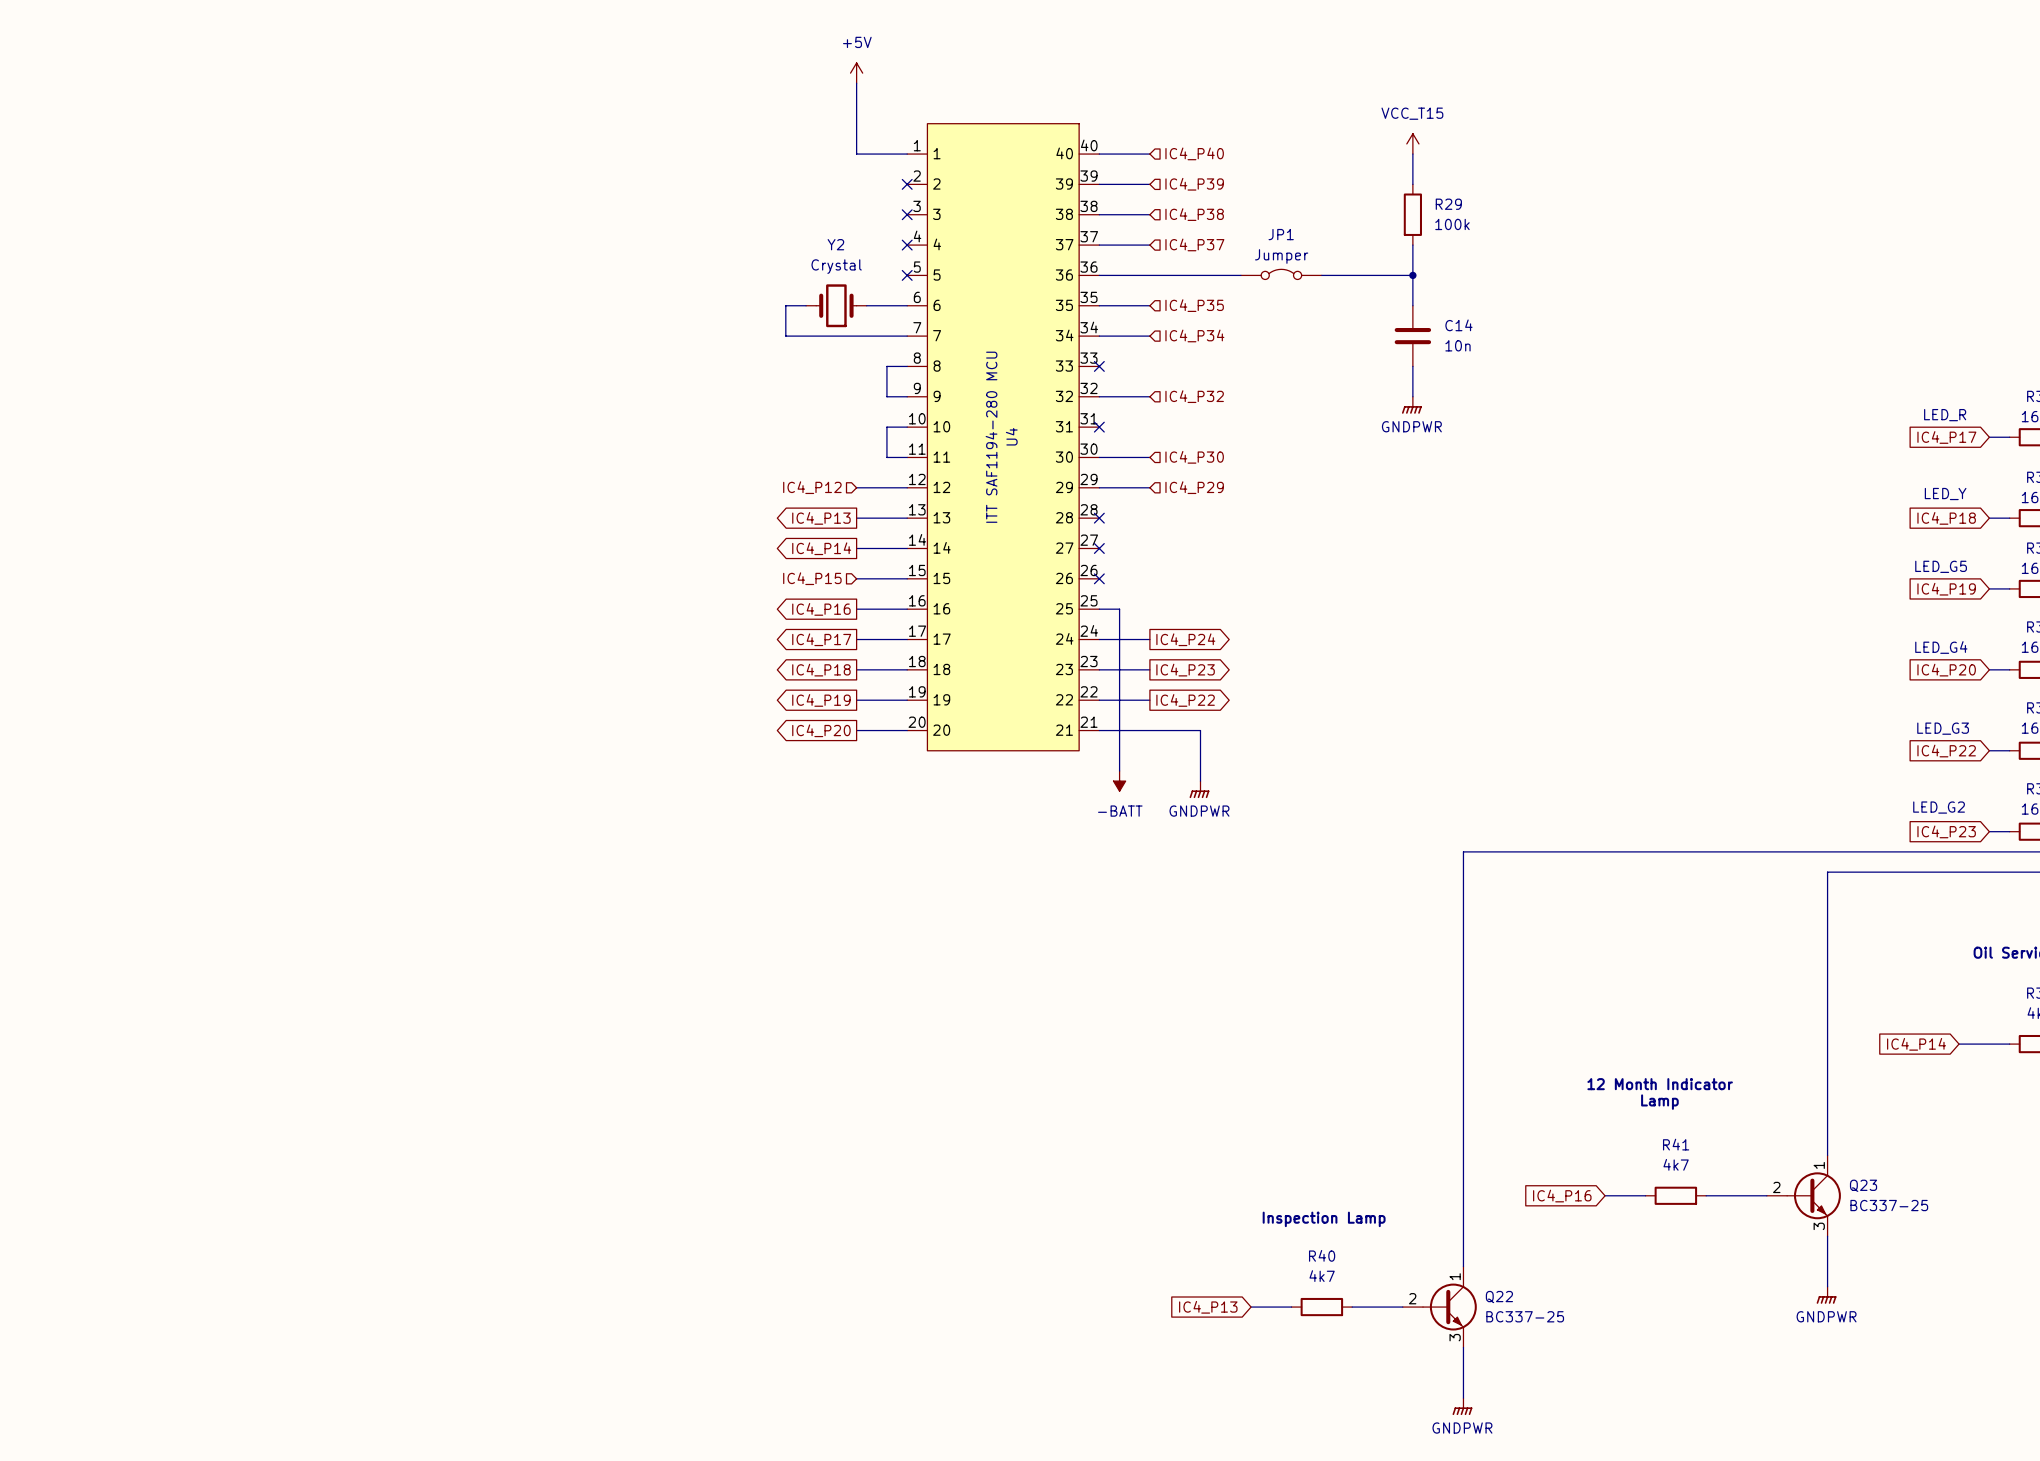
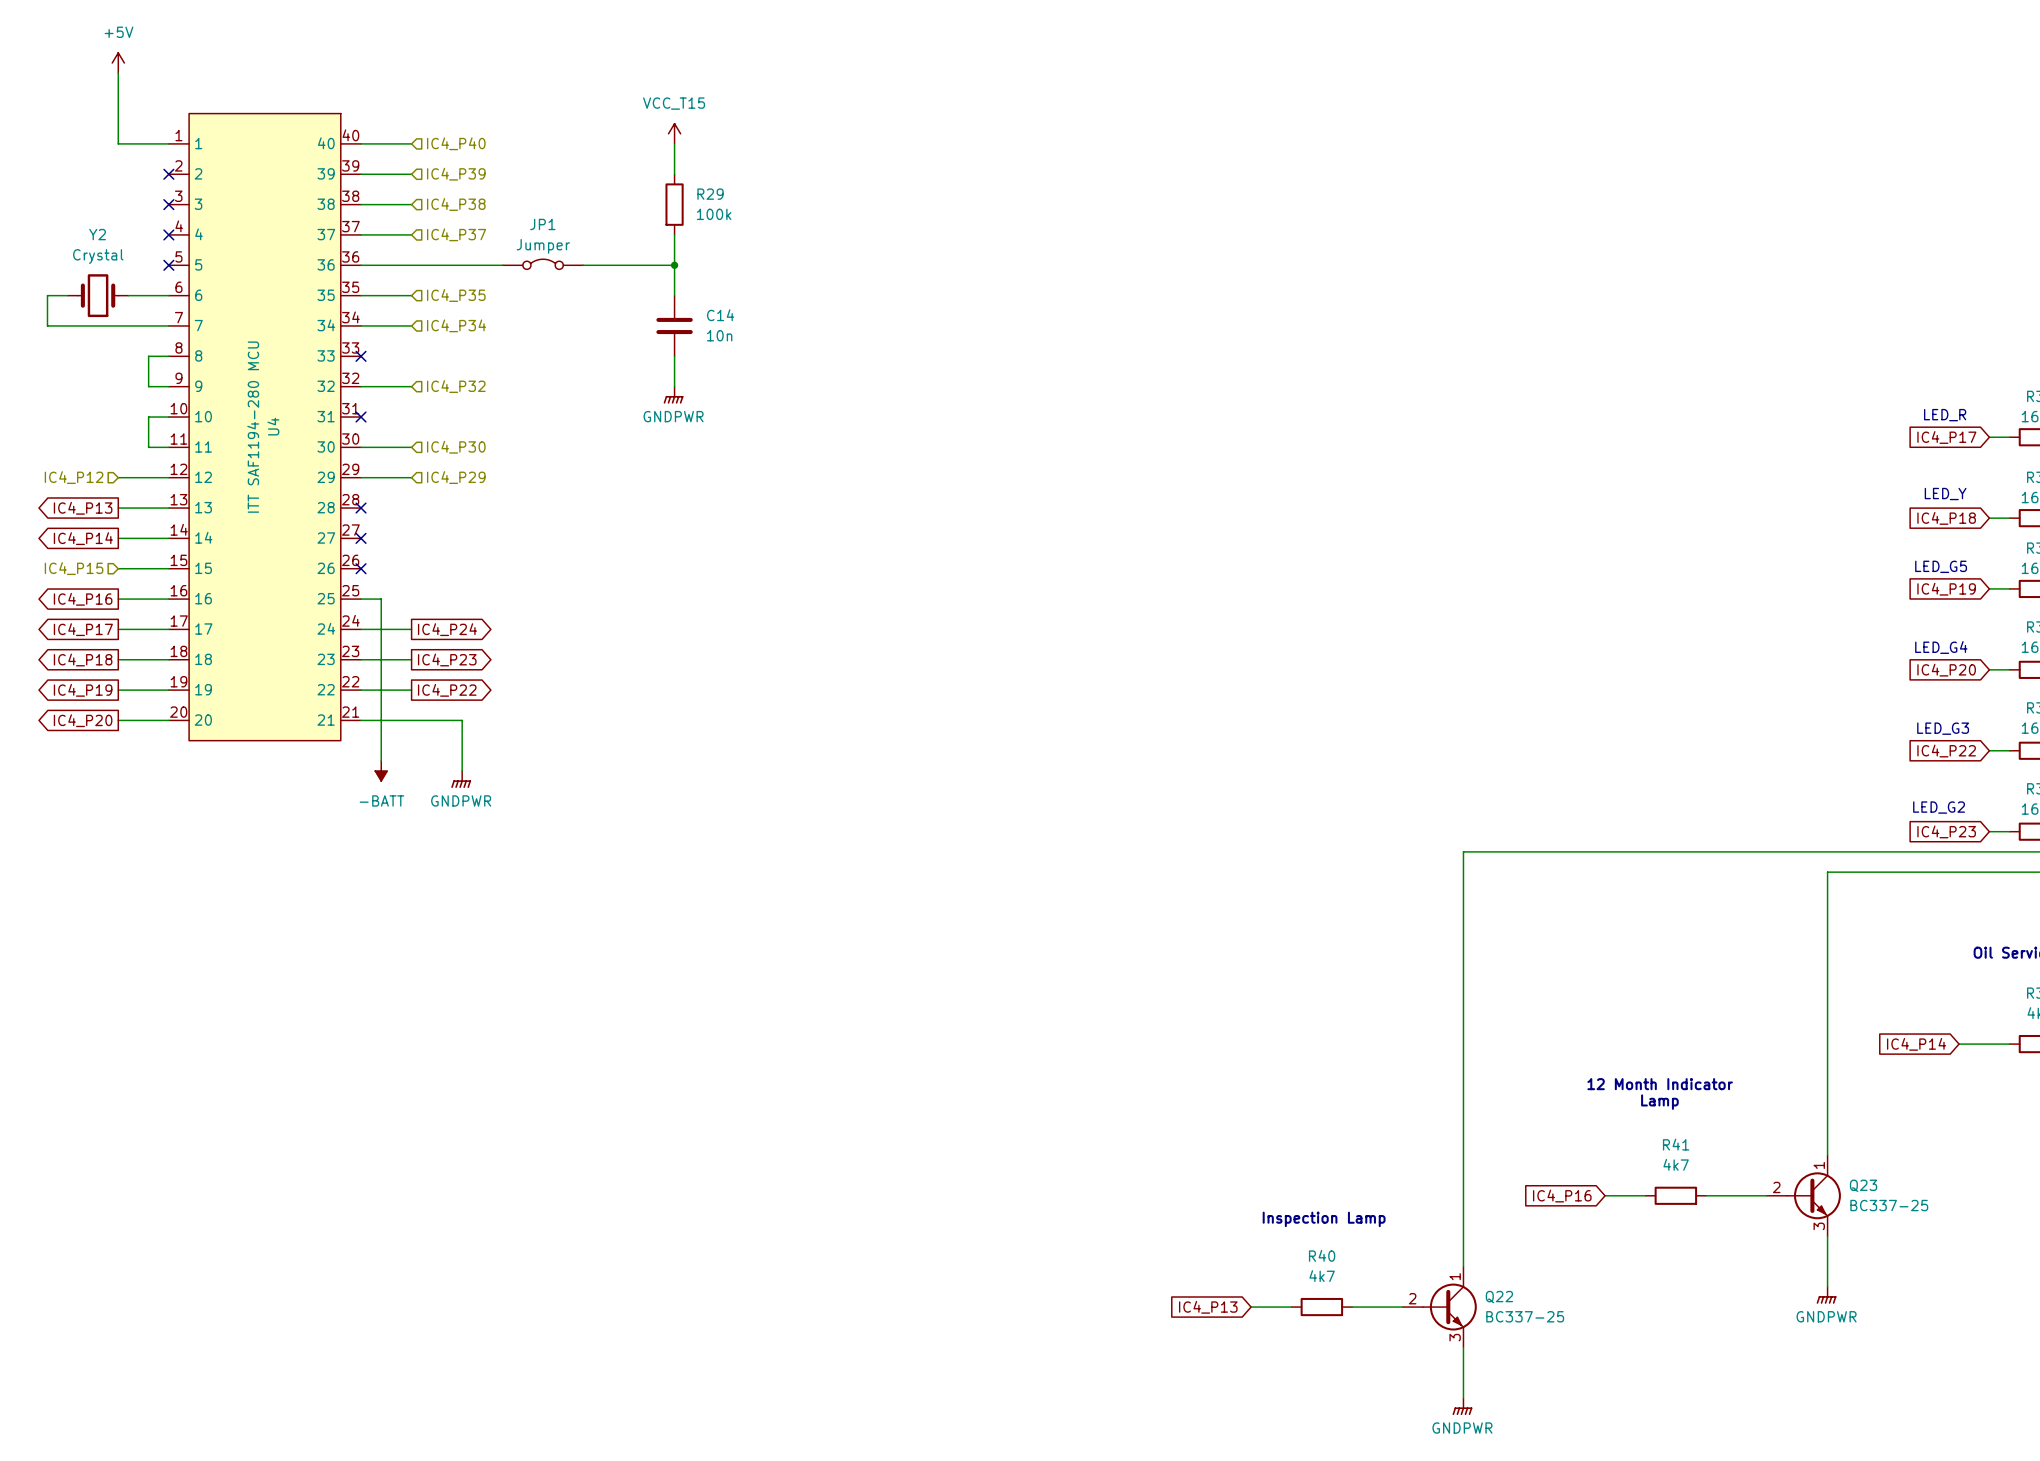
power symbol: none -> +5V (118, 63)
wire: none -> (118, 73) (118, 143) (168, 143)
power symbol: +5V (856, 73) -> none
wire: (856, 83) (856, 154) (907, 154) -> none
power symbol: none -> VCC_T15 (674, 133)
wire: none -> (361, 143) (411, 143)
hierarchical label: none -> IC4_P40 (456, 143)
wire: none -> (674, 143) (674, 174)
power symbol: VCC_T15 (1412, 143) -> none
hierarchical label: IC4_P40 (1194, 153) -> none
wire: (1099, 154) (1149, 154) -> none
wire: (1412, 154) (1412, 184) -> none
no-connect mark: none -> (168, 174)
wire: none -> (361, 174) (411, 174)
hierarchical label: none -> IC4_P39 (456, 174)
no-connect mark: (907, 184) -> none
wire: (1099, 184) (1149, 184) -> none
hierarchical label: IC4_P39 (1194, 184) -> none
no-connect mark: none -> (168, 204)
wire: none -> (361, 204) (411, 204)
hierarchical label: none -> IC4_P38 (456, 204)
no-connect mark: (907, 214) -> none
wire: (1099, 214) (1149, 214) -> none
hierarchical label: IC4_P38 (1194, 214) -> none
R29 position: (1412, 214) -> (674, 204)
no-connect mark: none -> (168, 234)
wire: none -> (361, 234) (411, 234)
hierarchical label: none -> IC4_P37 (456, 234)
wire: none -> (674, 234) (674, 295)
hierarchical label: IC4_P37 (1194, 244) -> none
no-connect mark: (907, 245) -> none
wire: (1099, 245) (1149, 245) -> none
wire: (1412, 245) (1412, 305) -> none
no-connect mark: none -> (168, 265)
wire: none -> (361, 265) (502, 265)
wire: none -> (583, 265) (674, 265)
junction: none -> (674, 265)
JP1 position: (1281, 274) -> (543, 264)
no-connect mark: (907, 275) -> none
wire: (1099, 275) (1240, 275) -> none
wire: (1321, 275) (1412, 275) -> none
junction: (1412, 275) -> none
wire: none -> (67, 295) (47, 295) (47, 325) (168, 325)
wire: none -> (128, 295) (168, 295)
wire: none -> (361, 295) (411, 295)
hierarchical label: none -> IC4_P35 (456, 295)
wire: (806, 305) (785, 305) (785, 336) (907, 336) -> none
Y2 position: (836, 305) -> (98, 295)
wire: (866, 305) (907, 305) -> none
wire: (1099, 305) (1149, 305) -> none
hierarchical label: IC4_P35 (1194, 305) -> none
wire: none -> (361, 325) (411, 325)
hierarchical label: none -> IC4_P34 (456, 325)
hierarchical label: IC4_P34 (1194, 335) -> none
wire: (1099, 336) (1149, 336) -> none
C14 position: (1412, 336) -> (674, 325)
wire: none -> (168, 356) (148, 356) (148, 386) (168, 386)
no-connect mark: none -> (361, 356)
wire: none -> (674, 356) (674, 386)
wire: (907, 366) (886, 366) (886, 396) (907, 396) -> none
no-connect mark: (1099, 366) -> none
wire: (1412, 366) (1412, 396) -> none
wire: none -> (361, 386) (411, 386)
hierarchical label: none -> IC4_P32 (456, 386)
power symbol: none -> GNDPWR (673, 395)
wire: (1099, 396) (1149, 396) -> none
hierarchical label: IC4_P32 (1194, 396) -> none
power symbol: GNDPWR (1411, 405) -> none
wire: none -> (168, 417) (148, 417) (148, 447) (168, 447)
no-connect mark: none -> (361, 417)
wire: (907, 427) (886, 427) (886, 457) (907, 457) -> none
no-connect mark: (1099, 427) -> none
U4 position: (1003, 437) -> (264, 427)
wire: none -> (361, 447) (411, 447)
hierarchical label: none -> IC4_P30 (456, 447)
wire: (1099, 457) (1149, 457) -> none
hierarchical label: IC4_P30 (1194, 457) -> none
hierarchical label: none -> IC4_P12 (74, 477)
wire: none -> (118, 477) (168, 477)
wire: none -> (361, 477) (411, 477)
hierarchical label: none -> IC4_P29 (456, 477)
hierarchical label: IC4_P12 (812, 487) -> none
wire: (856, 487) (907, 487) -> none
wire: (1099, 487) (1149, 487) -> none
hierarchical label: IC4_P29 (1194, 487) -> none
global label: none -> IC4_P13 (83, 508)
wire: none -> (118, 508) (168, 508)
no-connect mark: none -> (361, 508)
global label: IC4_P13 (821, 518) -> none
wire: (856, 518) (907, 518) -> none
no-connect mark: (1099, 518) -> none
global label: none -> IC4_P14 (83, 538)
wire: none -> (118, 538) (168, 538)
no-connect mark: none -> (361, 538)
global label: IC4_P14 (821, 548) -> none
wire: (856, 548) (907, 548) -> none
no-connect mark: (1099, 548) -> none
hierarchical label: none -> IC4_P15 (74, 568)
wire: none -> (118, 568) (168, 568)
no-connect mark: none -> (361, 568)
hierarchical label: IC4_P15 (812, 578) -> none
wire: (856, 578) (907, 578) -> none
no-connect mark: (1099, 578) -> none
global label: none -> IC4_P16 (83, 599)
wire: none -> (118, 599) (168, 599)
wire: none -> (361, 599) (381, 599) (381, 760)
global label: IC4_P16 (821, 609) -> none
wire: (856, 609) (907, 609) -> none
wire: (1099, 609) (1119, 609) (1119, 771) -> none
global label: none -> IC4_P17 (83, 629)
wire: none -> (118, 629) (168, 629)
wire: none -> (361, 629) (411, 629)
global label: none -> IC4_P24 (447, 629)
global label: IC4_P17 (821, 639) -> none
wire: (856, 639) (907, 639) -> none
wire: (1099, 639) (1149, 639) -> none
global label: IC4_P24 (1185, 639) -> none
global label: none -> IC4_P18 (83, 659)
wire: none -> (118, 659) (168, 659)
wire: none -> (361, 659) (411, 659)
global label: none -> IC4_P23 (447, 659)
wire: (856, 669) (907, 669) -> none
wire: (1099, 669) (1149, 669) -> none
global label: IC4_P18 (821, 670) -> none
global label: IC4_P23 (1185, 670) -> none
global label: none -> IC4_P19 (83, 690)
wire: none -> (118, 690) (168, 690)
wire: none -> (361, 690) (411, 690)
global label: none -> IC4_P22 (447, 690)
global label: IC4_P19 (821, 700) -> none
wire: (856, 700) (907, 700) -> none
wire: (1099, 700) (1149, 700) -> none
global label: IC4_P22 (1185, 700) -> none
global label: none -> IC4_P20 (83, 720)
wire: none -> (118, 720) (168, 720)
wire: none -> (361, 720) (462, 720) (462, 771)
global label: IC4_P20 (821, 730) -> none
wire: (856, 730) (907, 730) -> none
wire: (1099, 730) (1200, 730) (1200, 781) -> none
power symbol: none -> -BATT (381, 771)
power symbol: none -> GNDPWR (461, 779)
power symbol: -BATT (1119, 781) -> none
power symbol: GNDPWR (1199, 789) -> none

